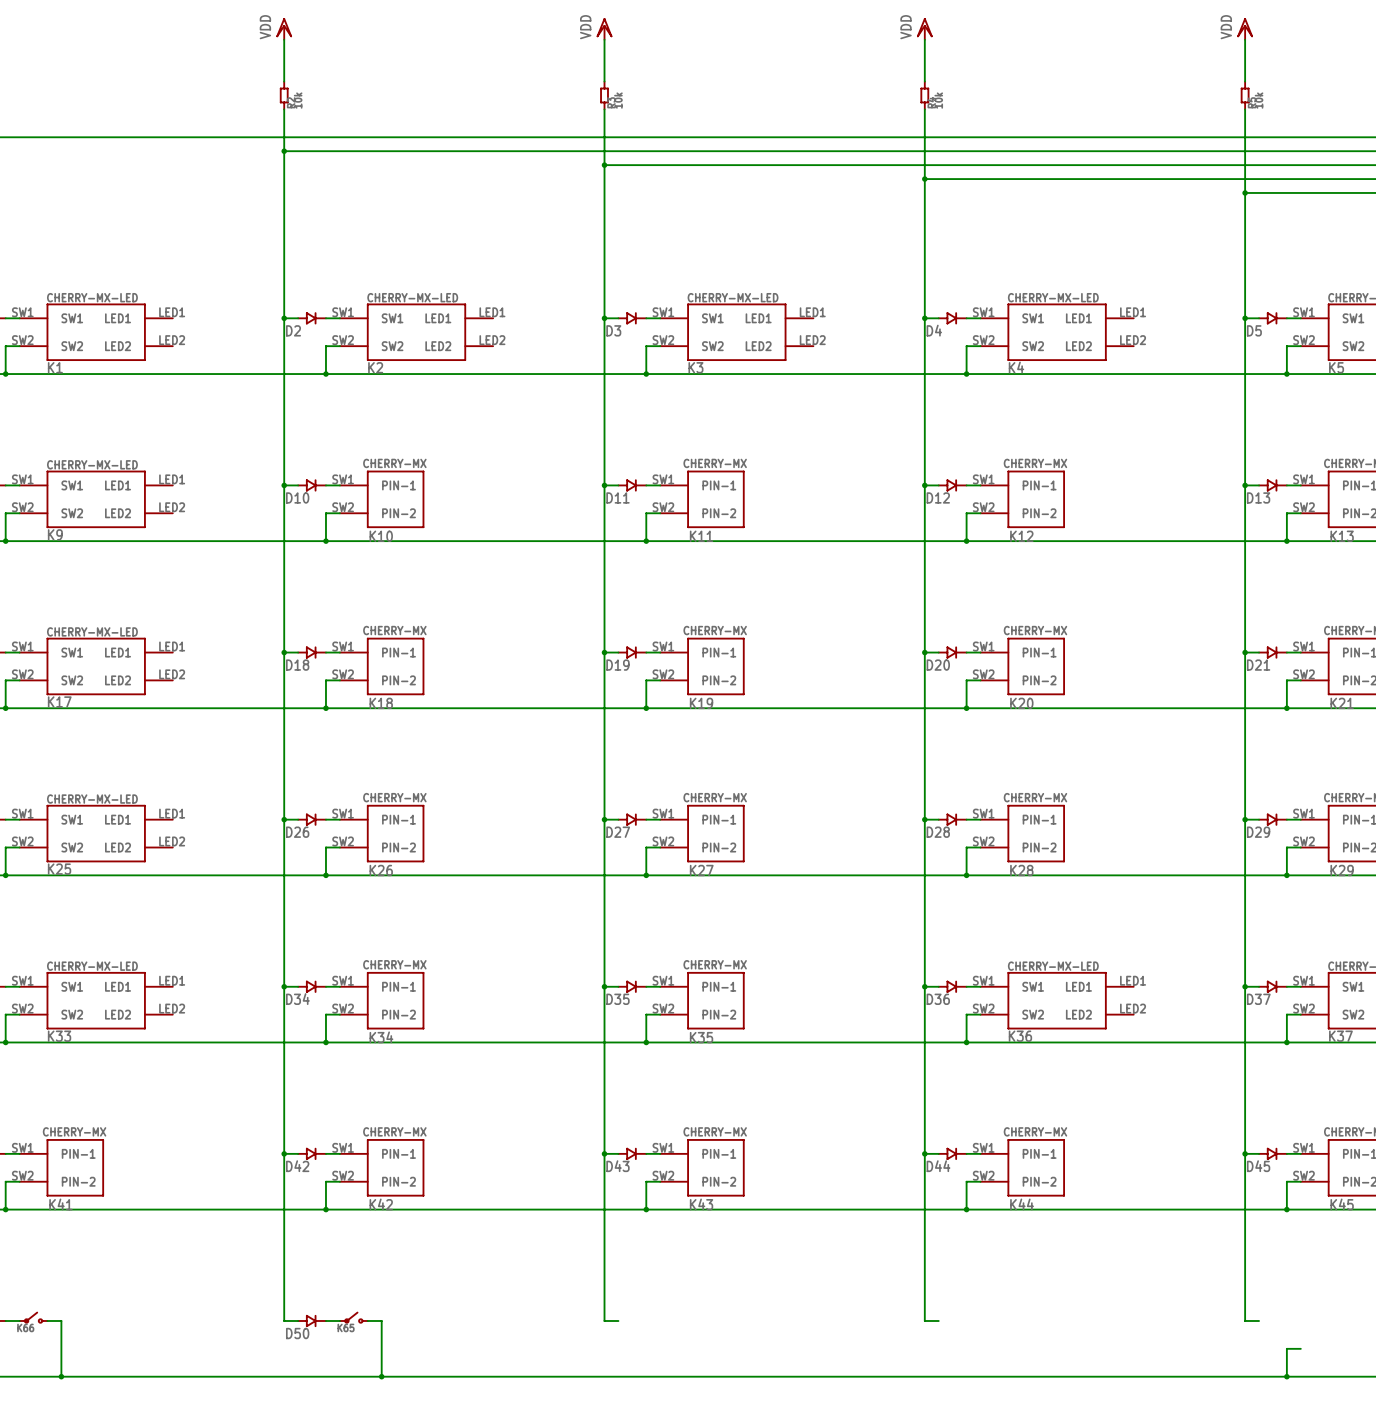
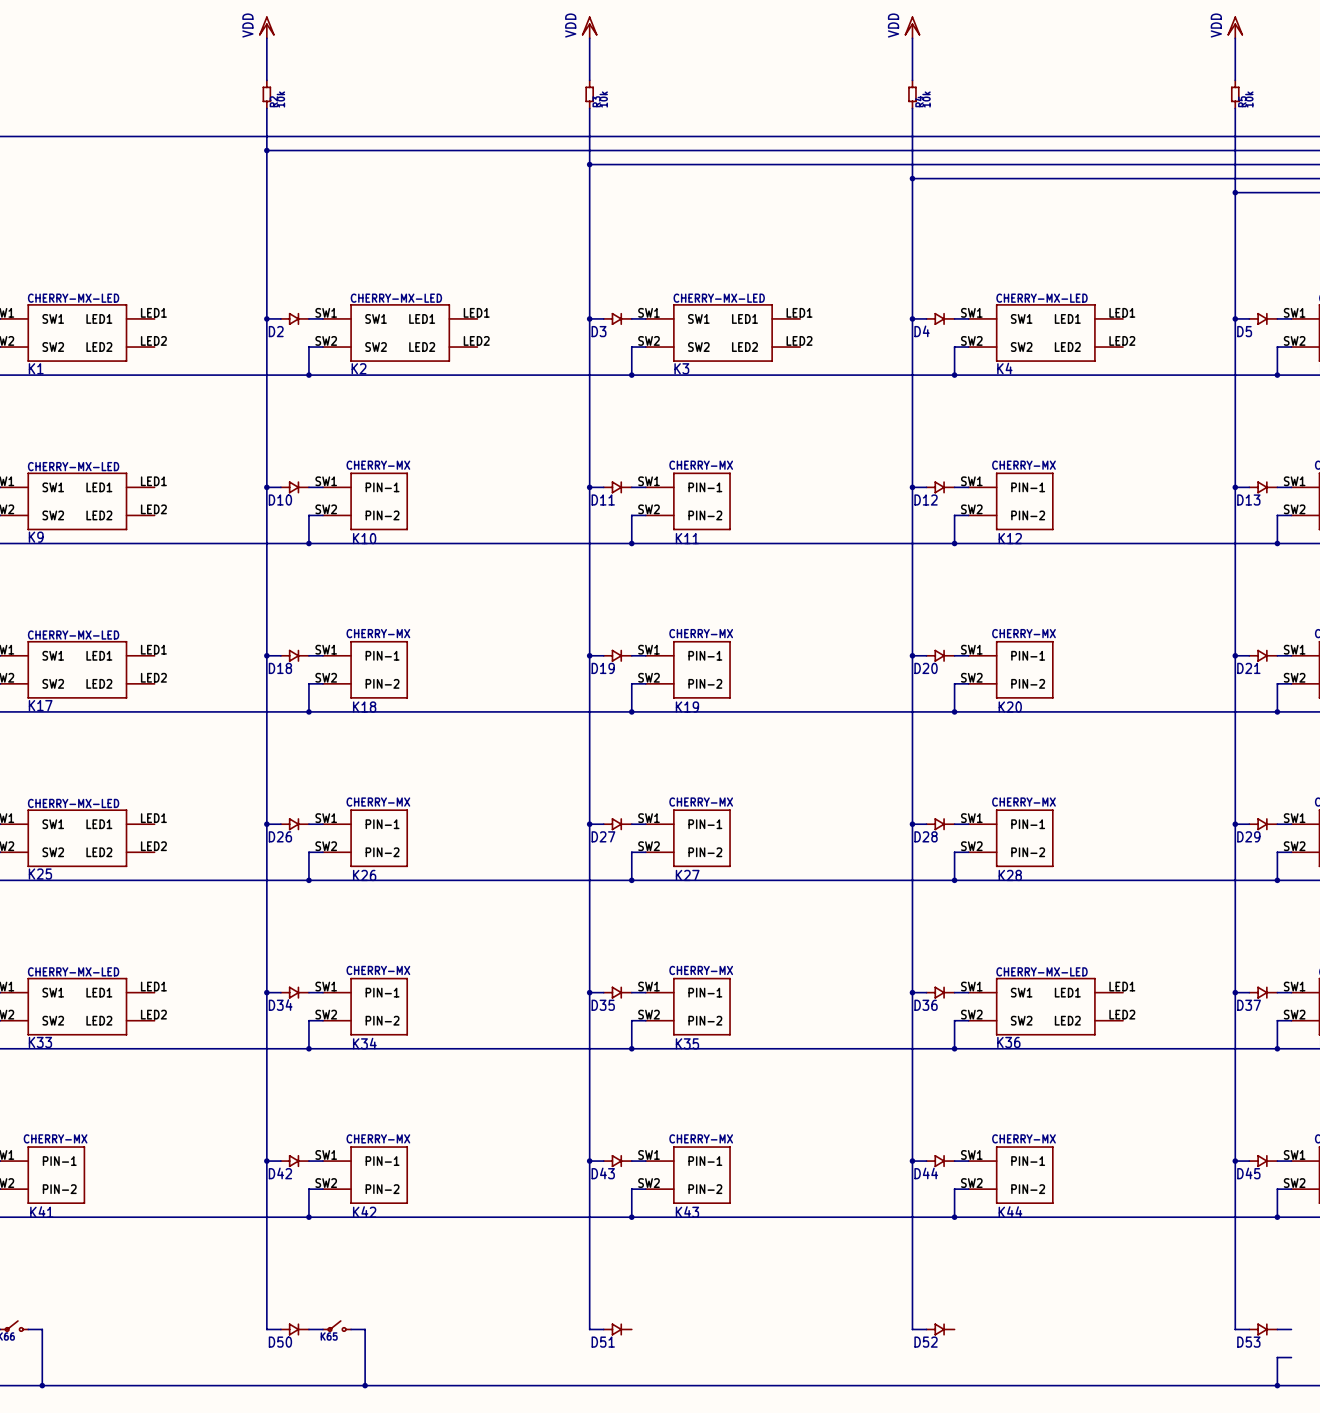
D51: none -> (617, 1329)
D52: none -> (940, 1329)
D53: none -> (1263, 1329)
wire: none -> (1277, 1329) (1291, 1329)

